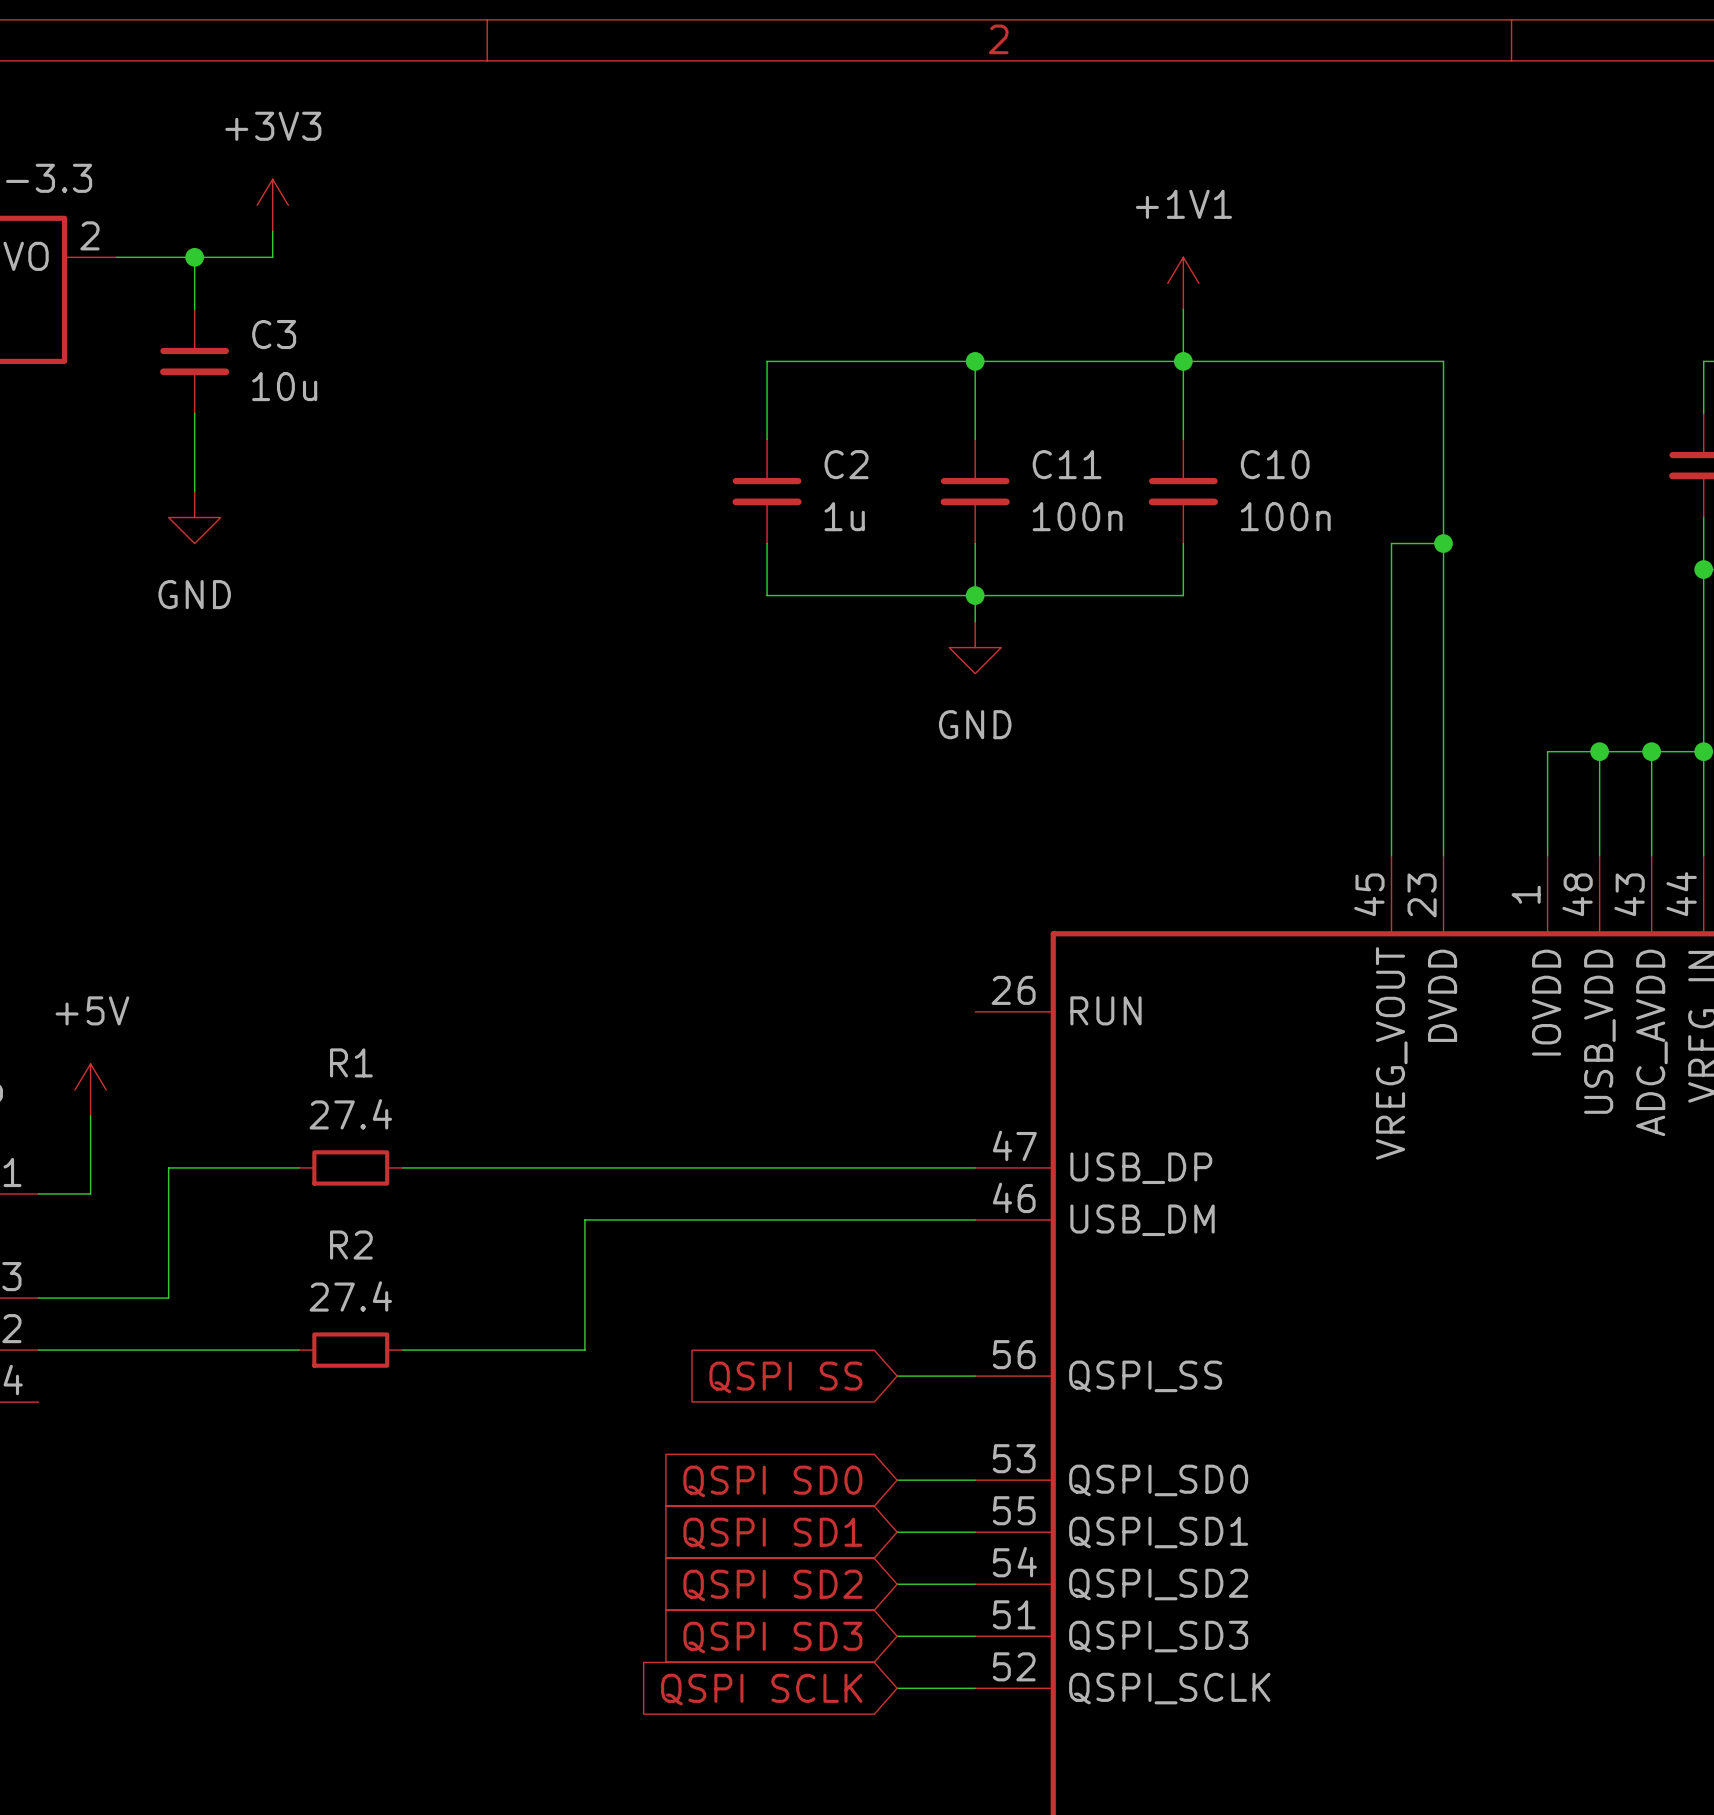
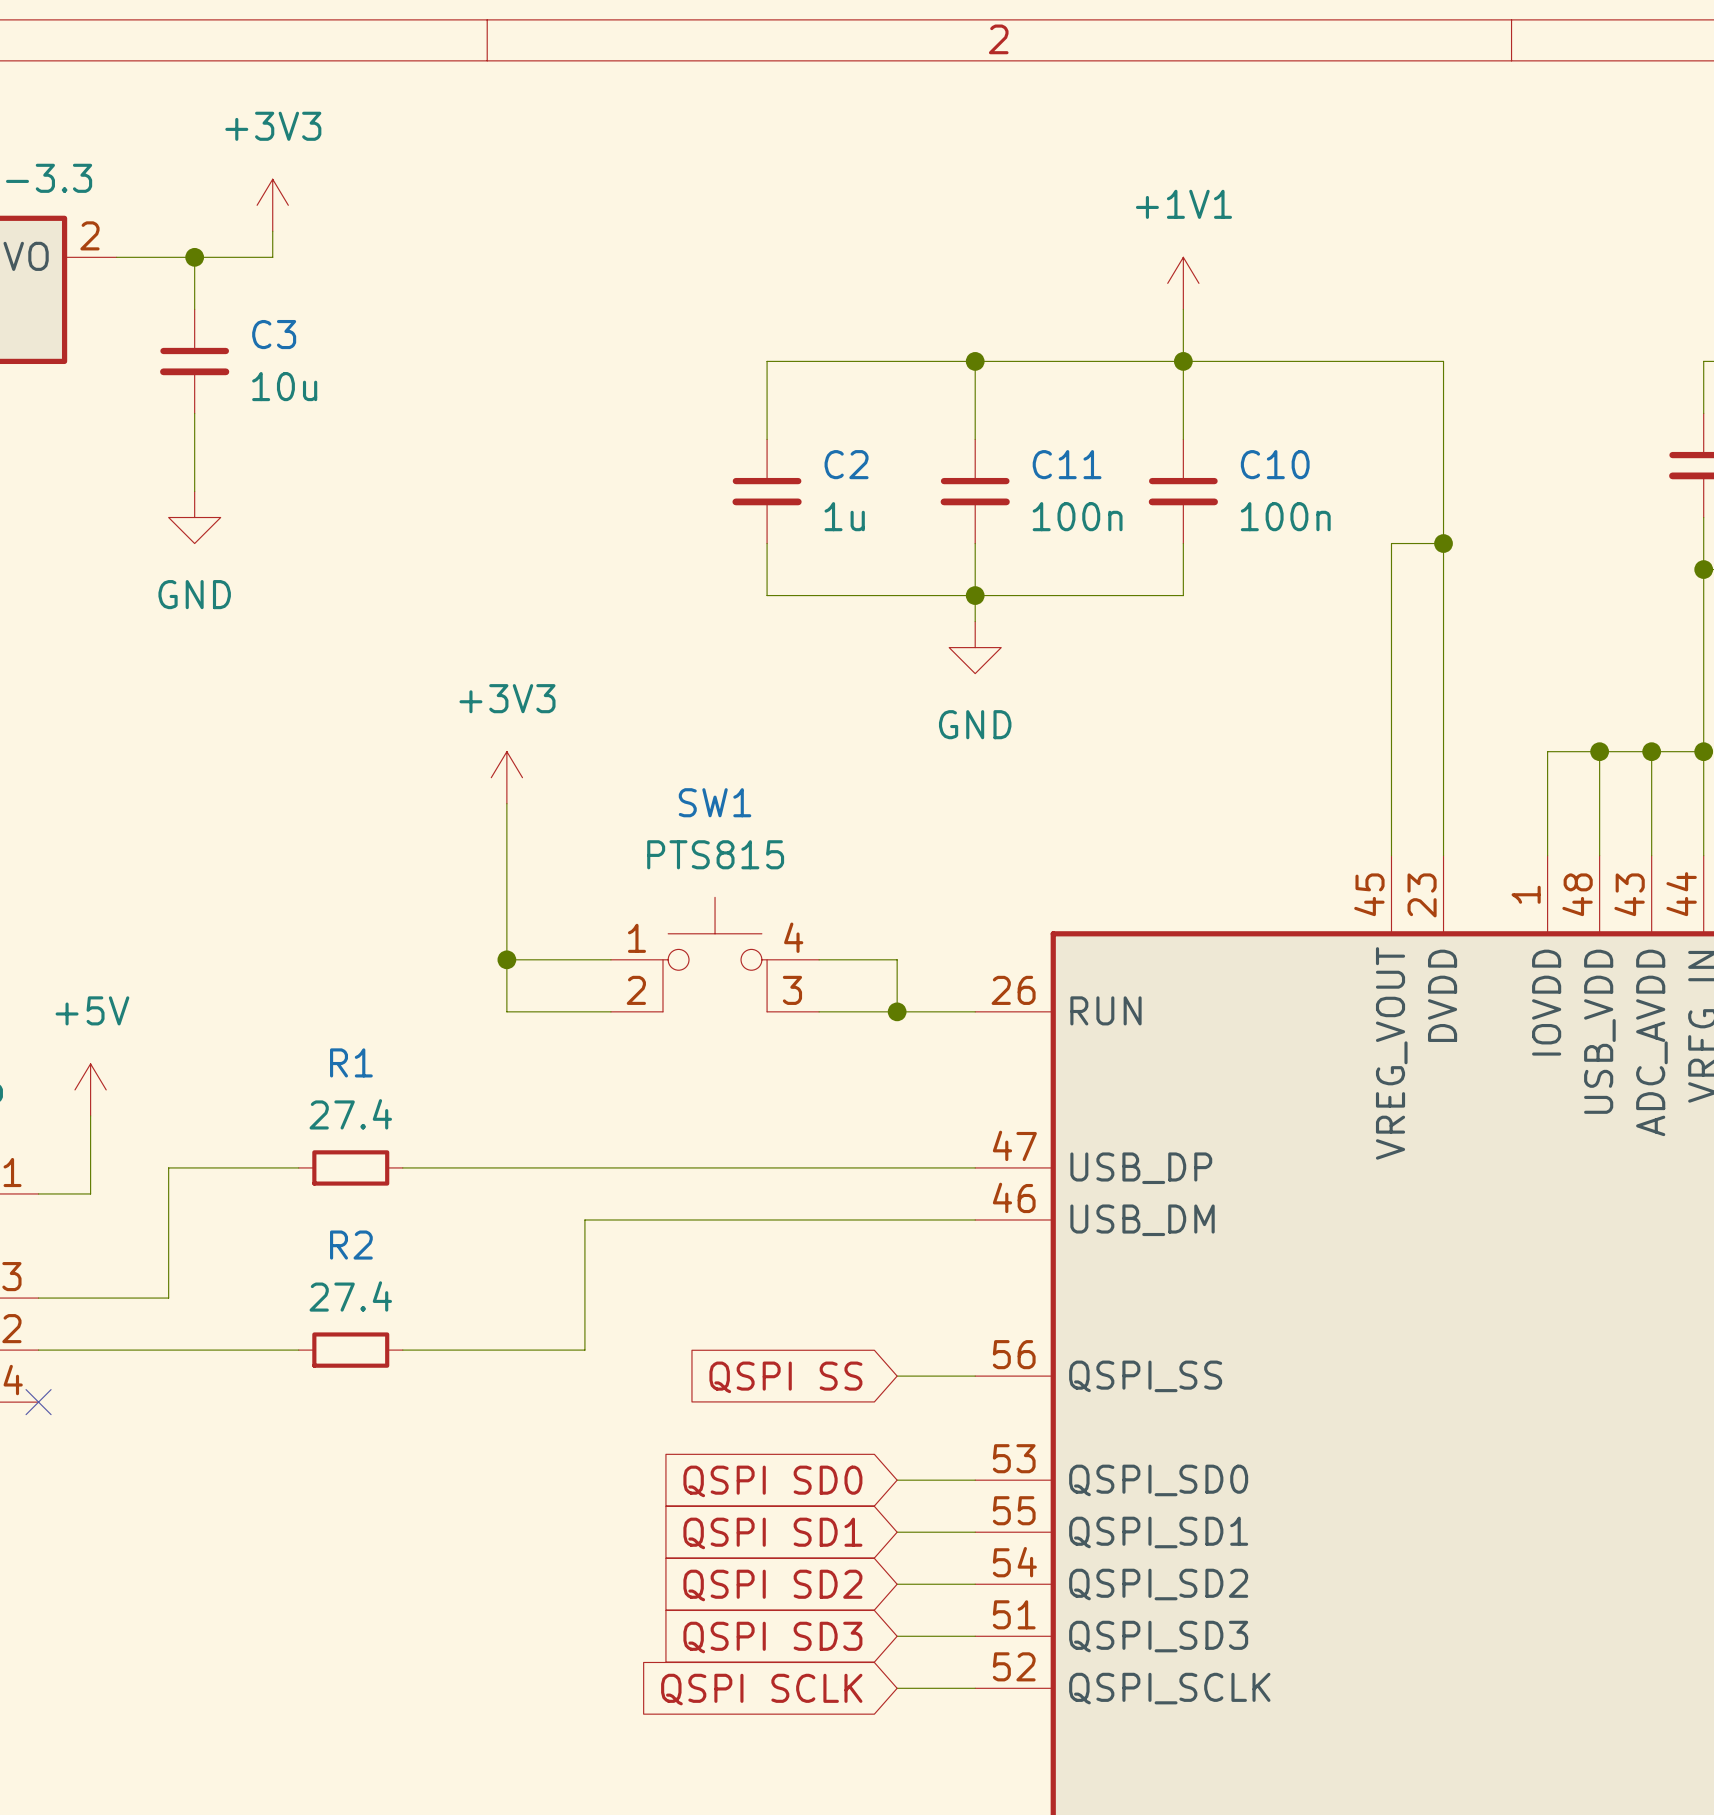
power symbol: none -> +3V3 (506, 777)
wire: none -> (506, 803) (506, 1011) (610, 1011)
SW1: none -> PTS815 (715, 954)
wire: none -> (506, 959) (610, 959)
junction: none -> (506, 959)
wire: none -> (819, 959) (897, 959) (897, 1011)
wire: none -> (819, 1011) (975, 1011)
junction: none -> (897, 1011)
no-connect mark: none -> (38, 1402)

